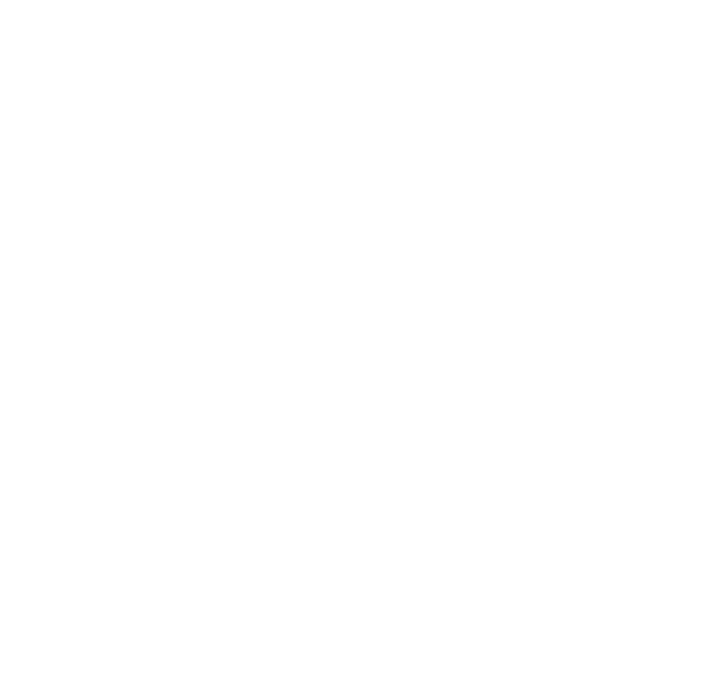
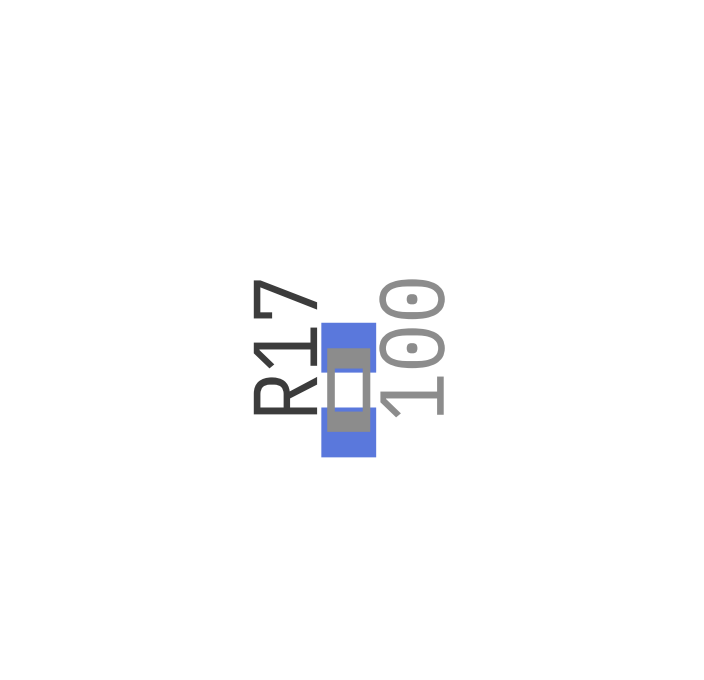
R17: none -> 100 (348, 390)

